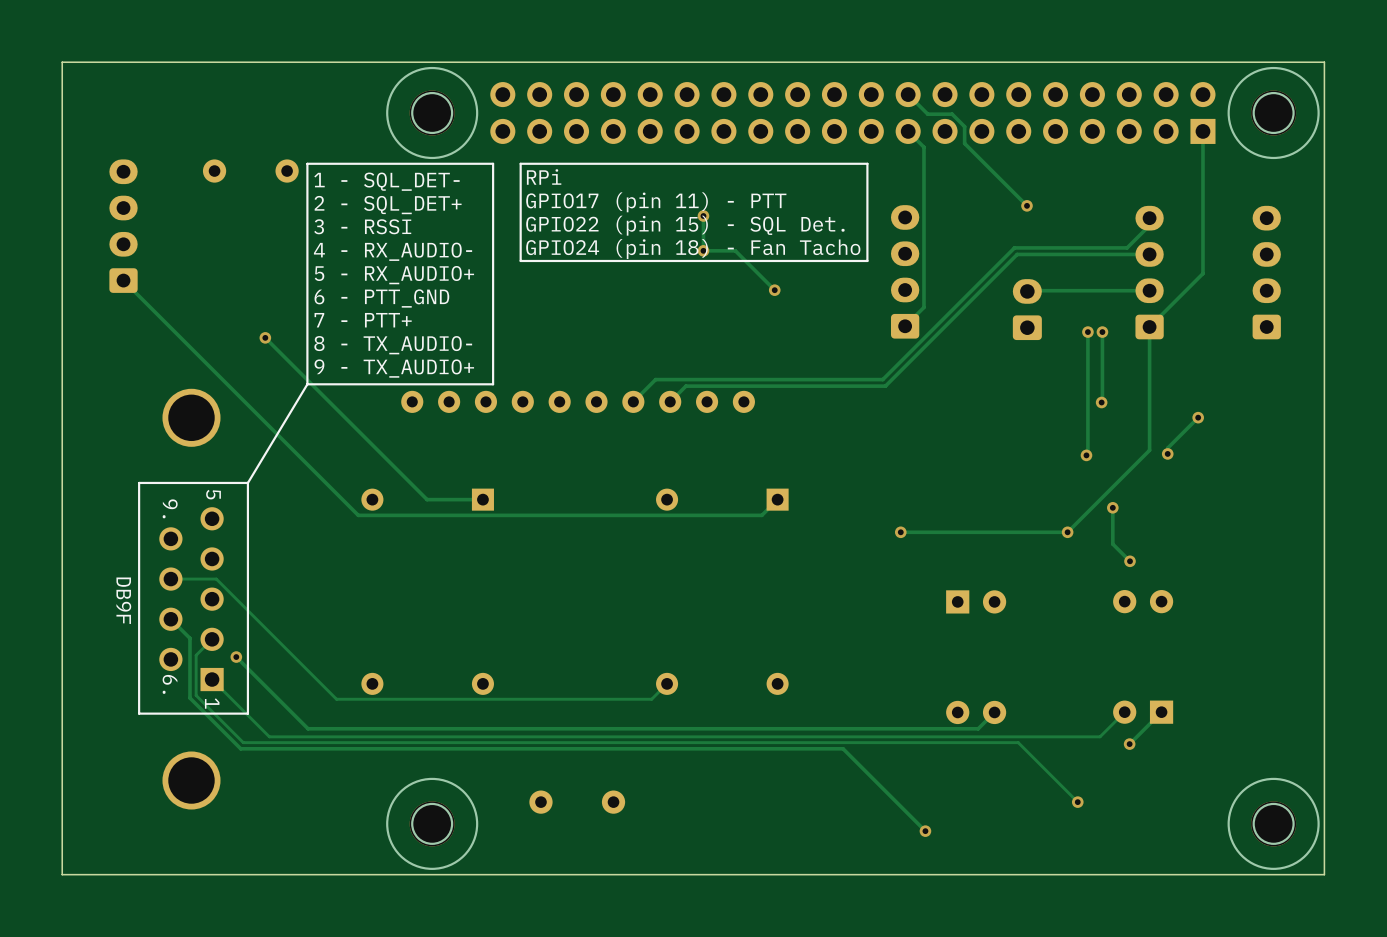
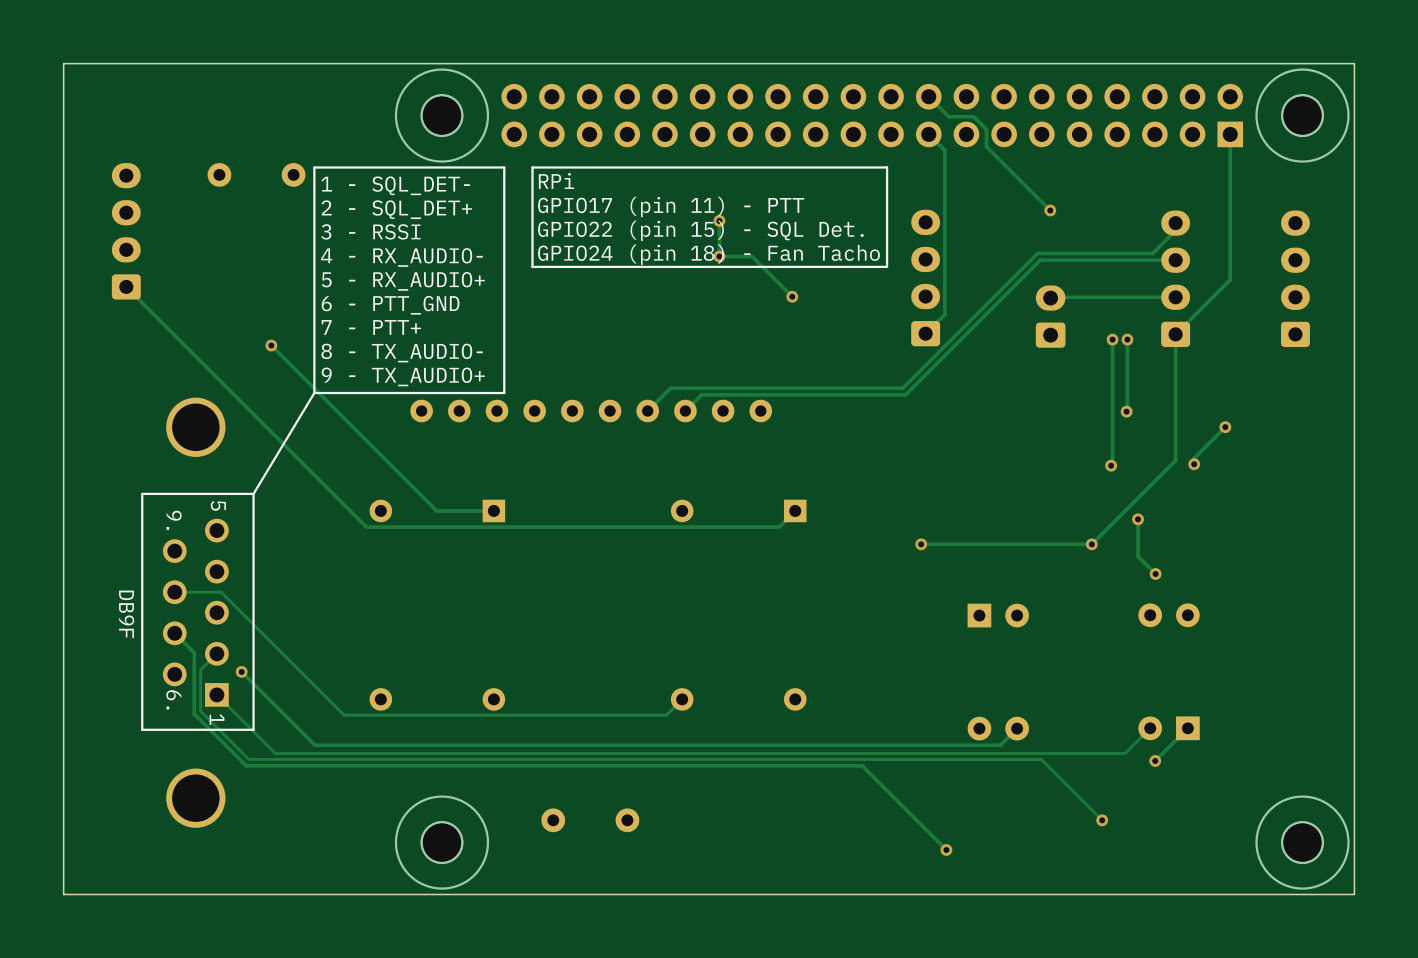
part footprint: [386, 66, 479, 160] -> [394, 68, 490, 163]
part footprint: [1227, 66, 1320, 160] -> [1255, 68, 1350, 163]
part footprint: [386, 777, 479, 870] -> [394, 795, 490, 890]
part footprint: [1227, 777, 1320, 870] -> [1255, 795, 1350, 890]

